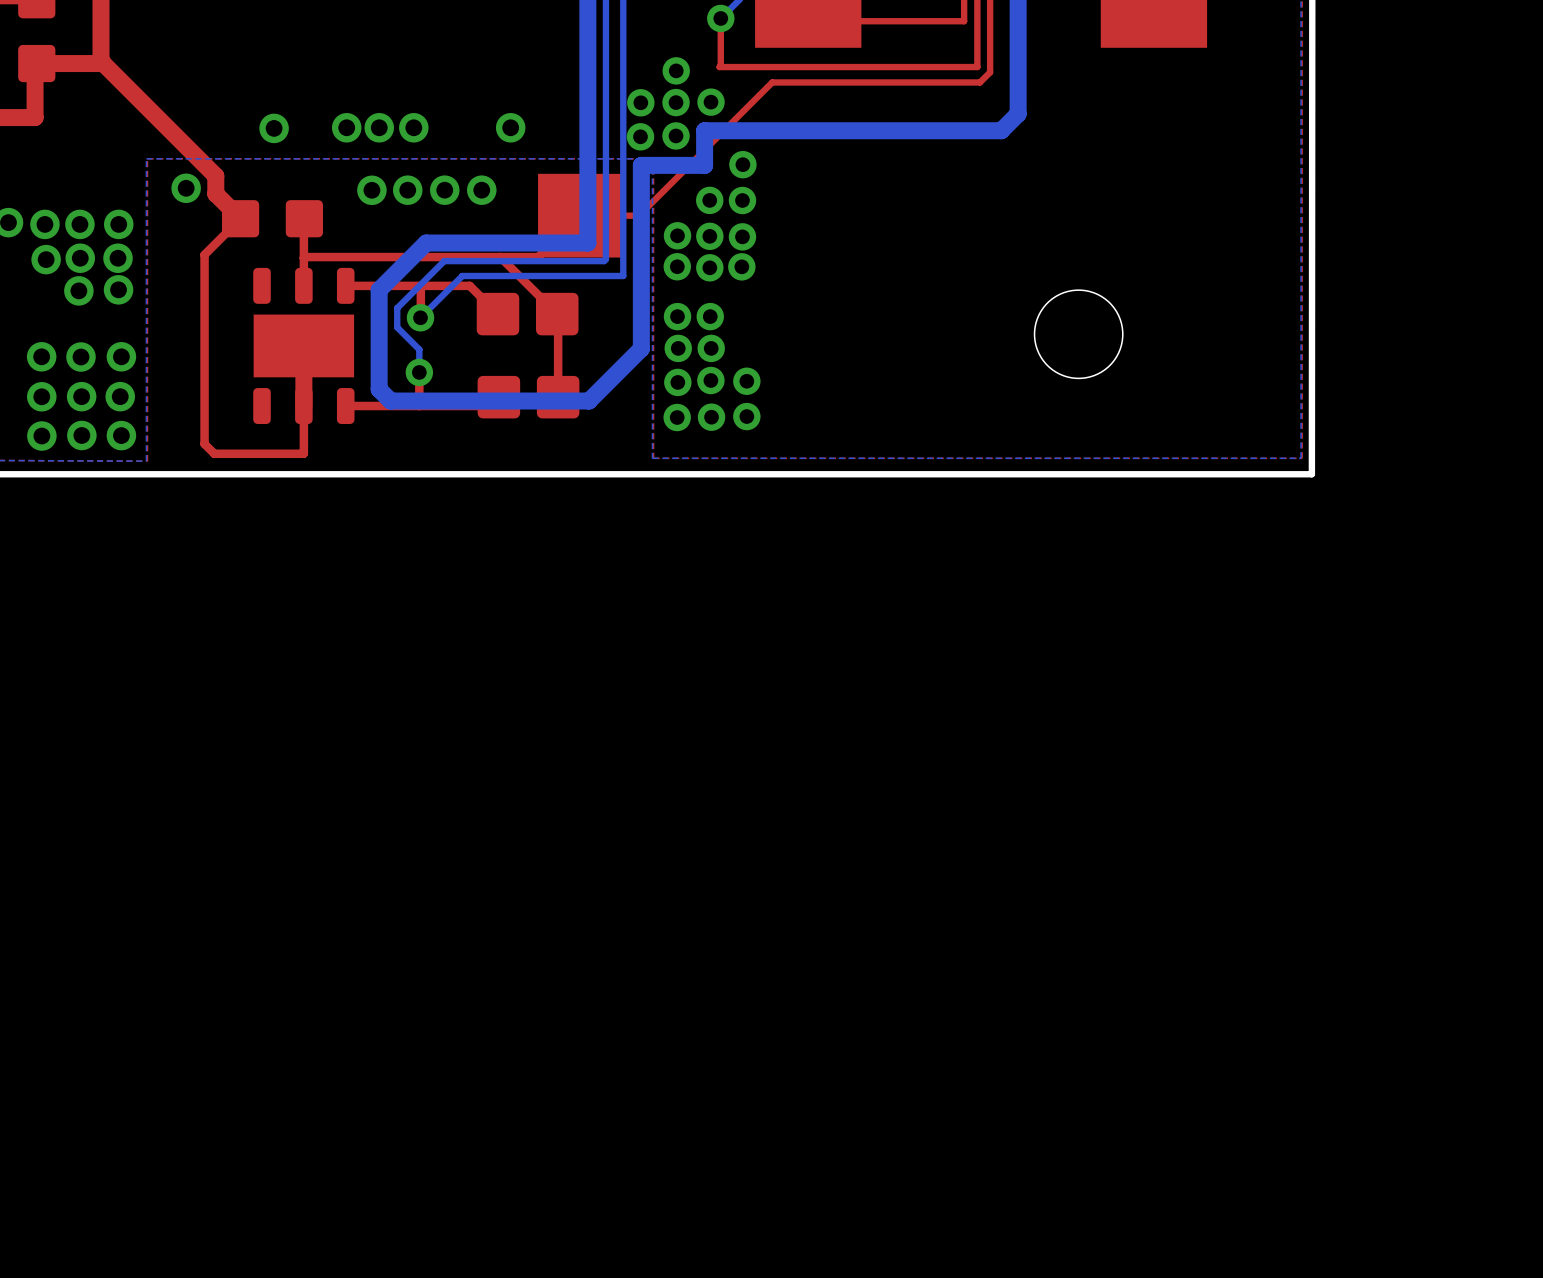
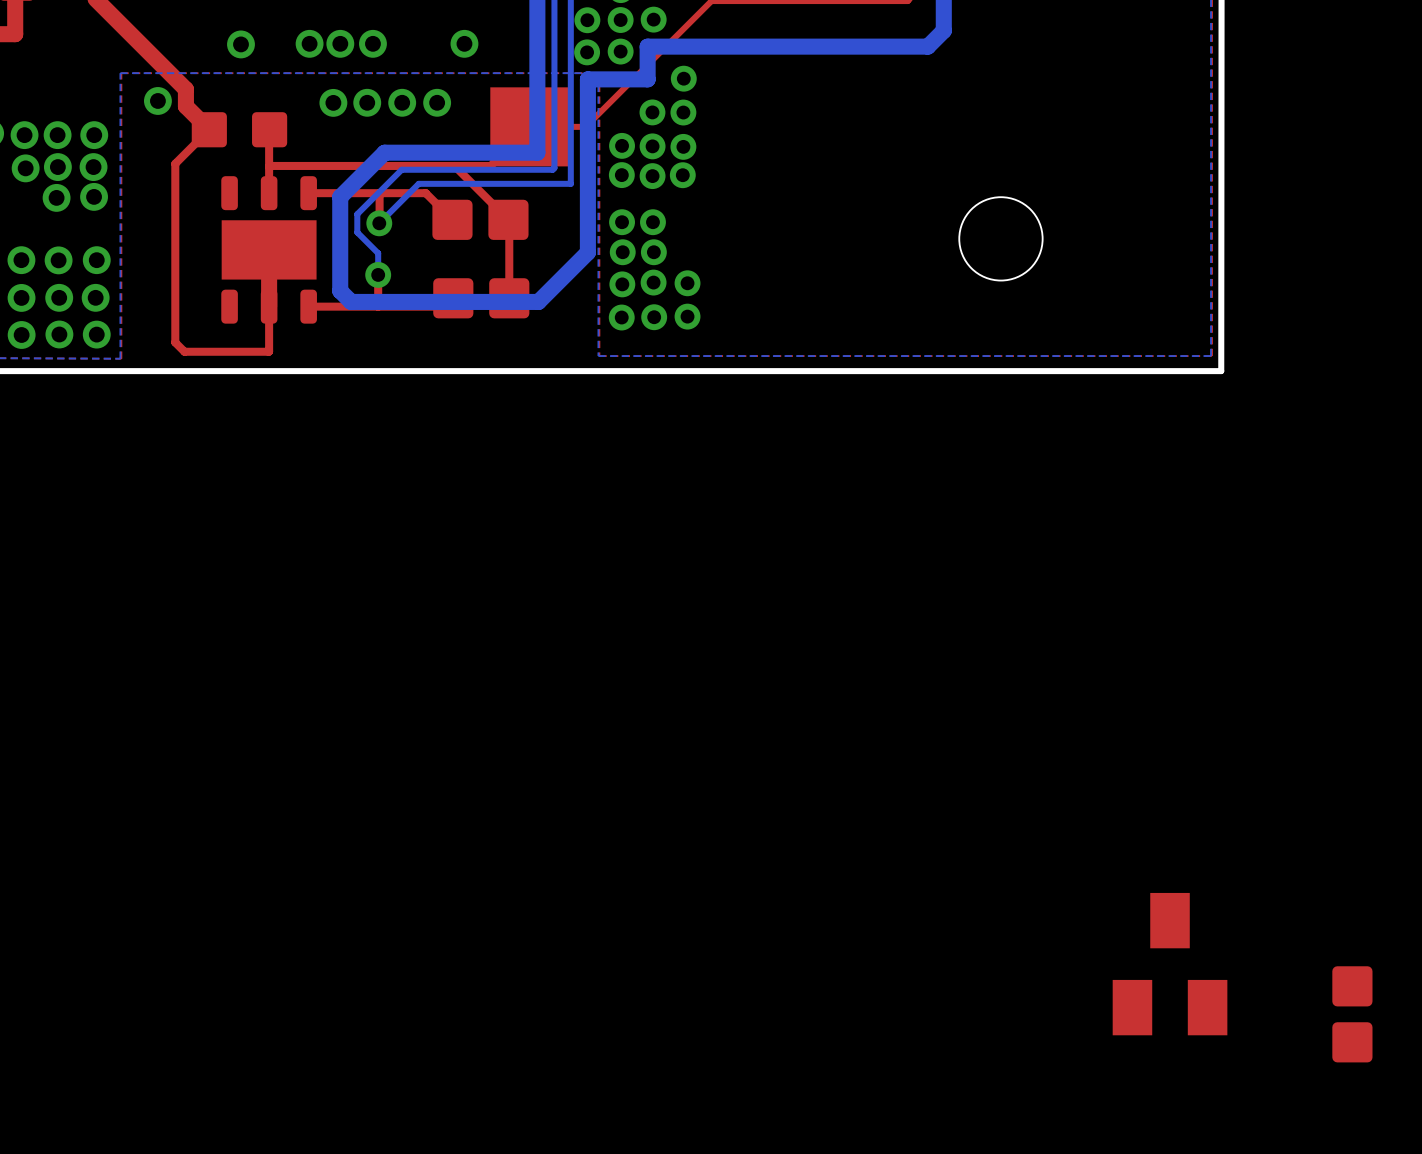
part: none -> (1170, 964)
part: none -> (1352, 1014)

